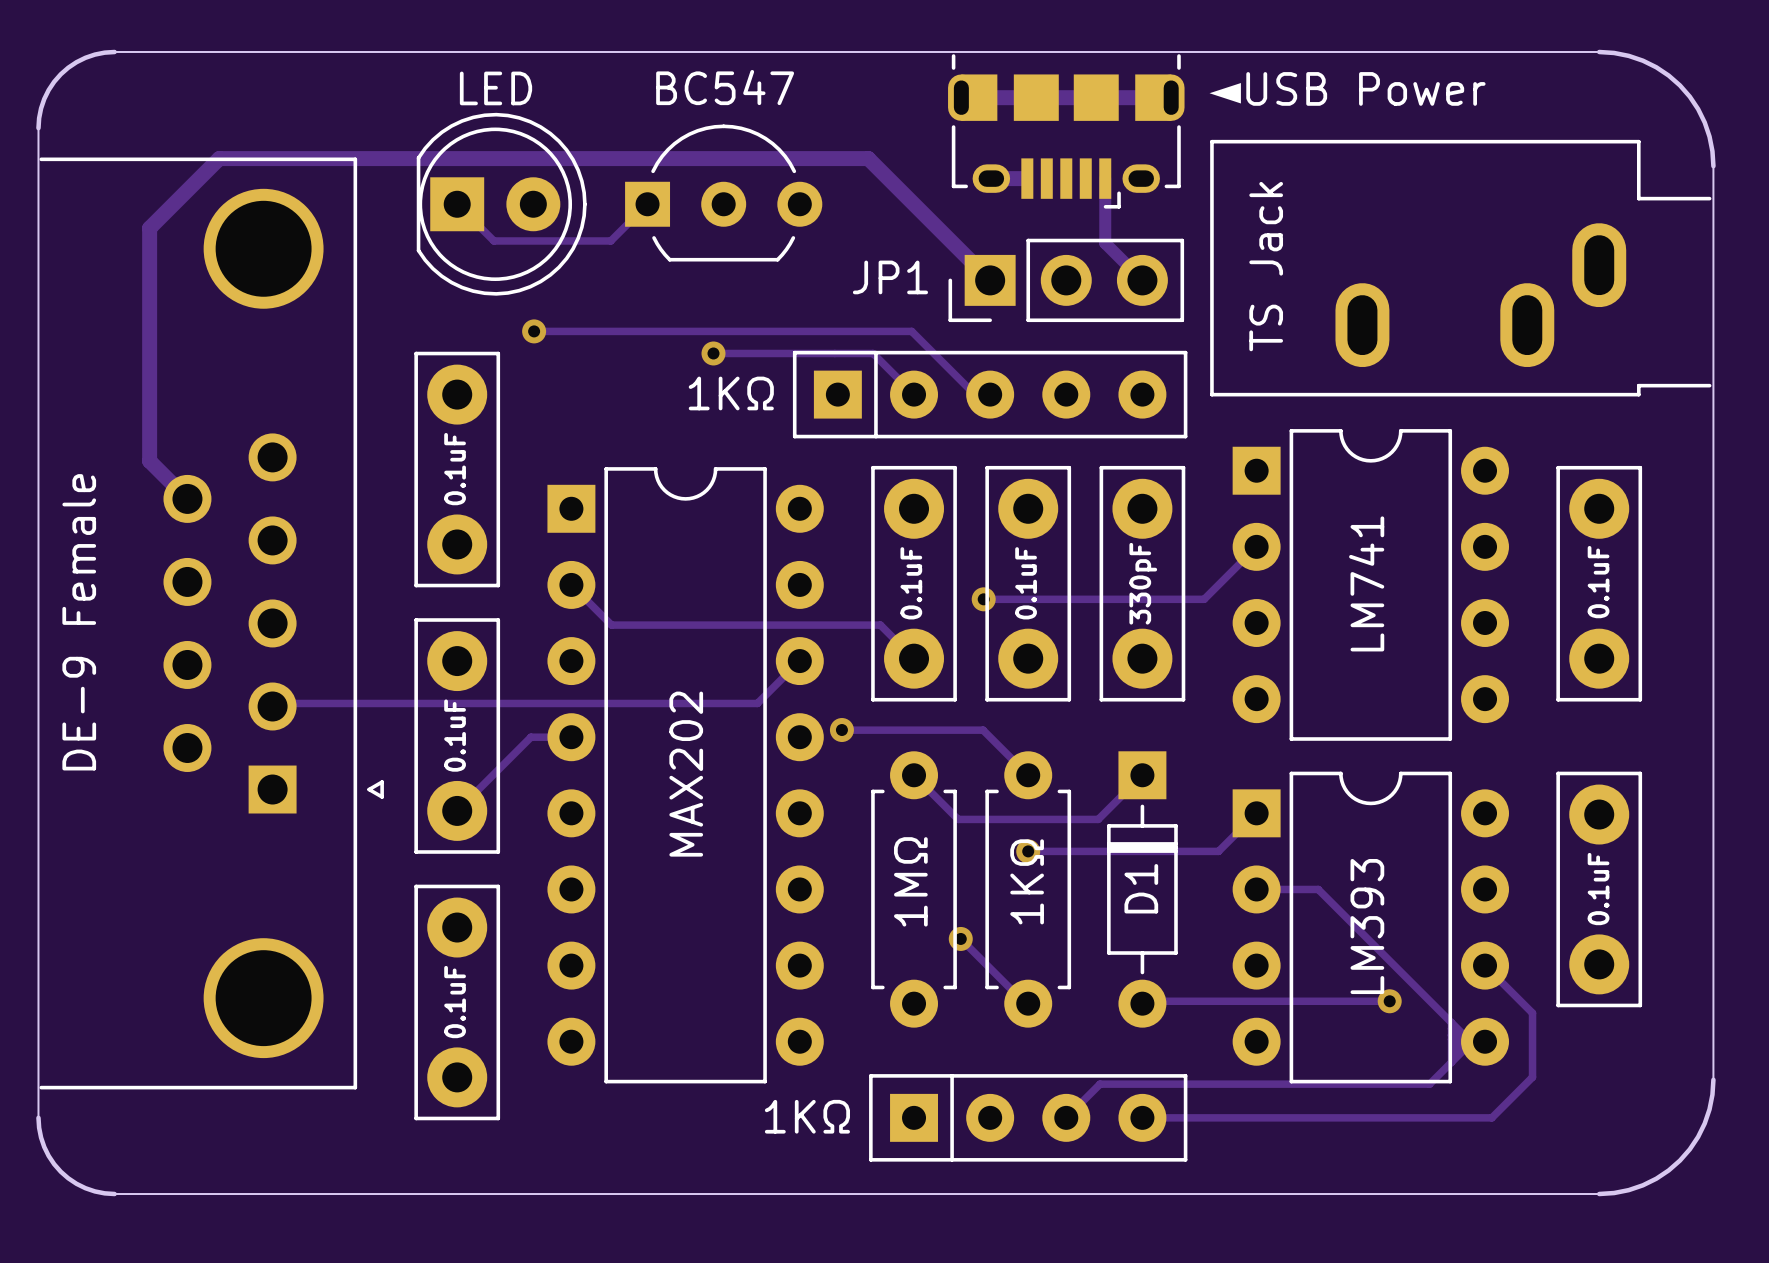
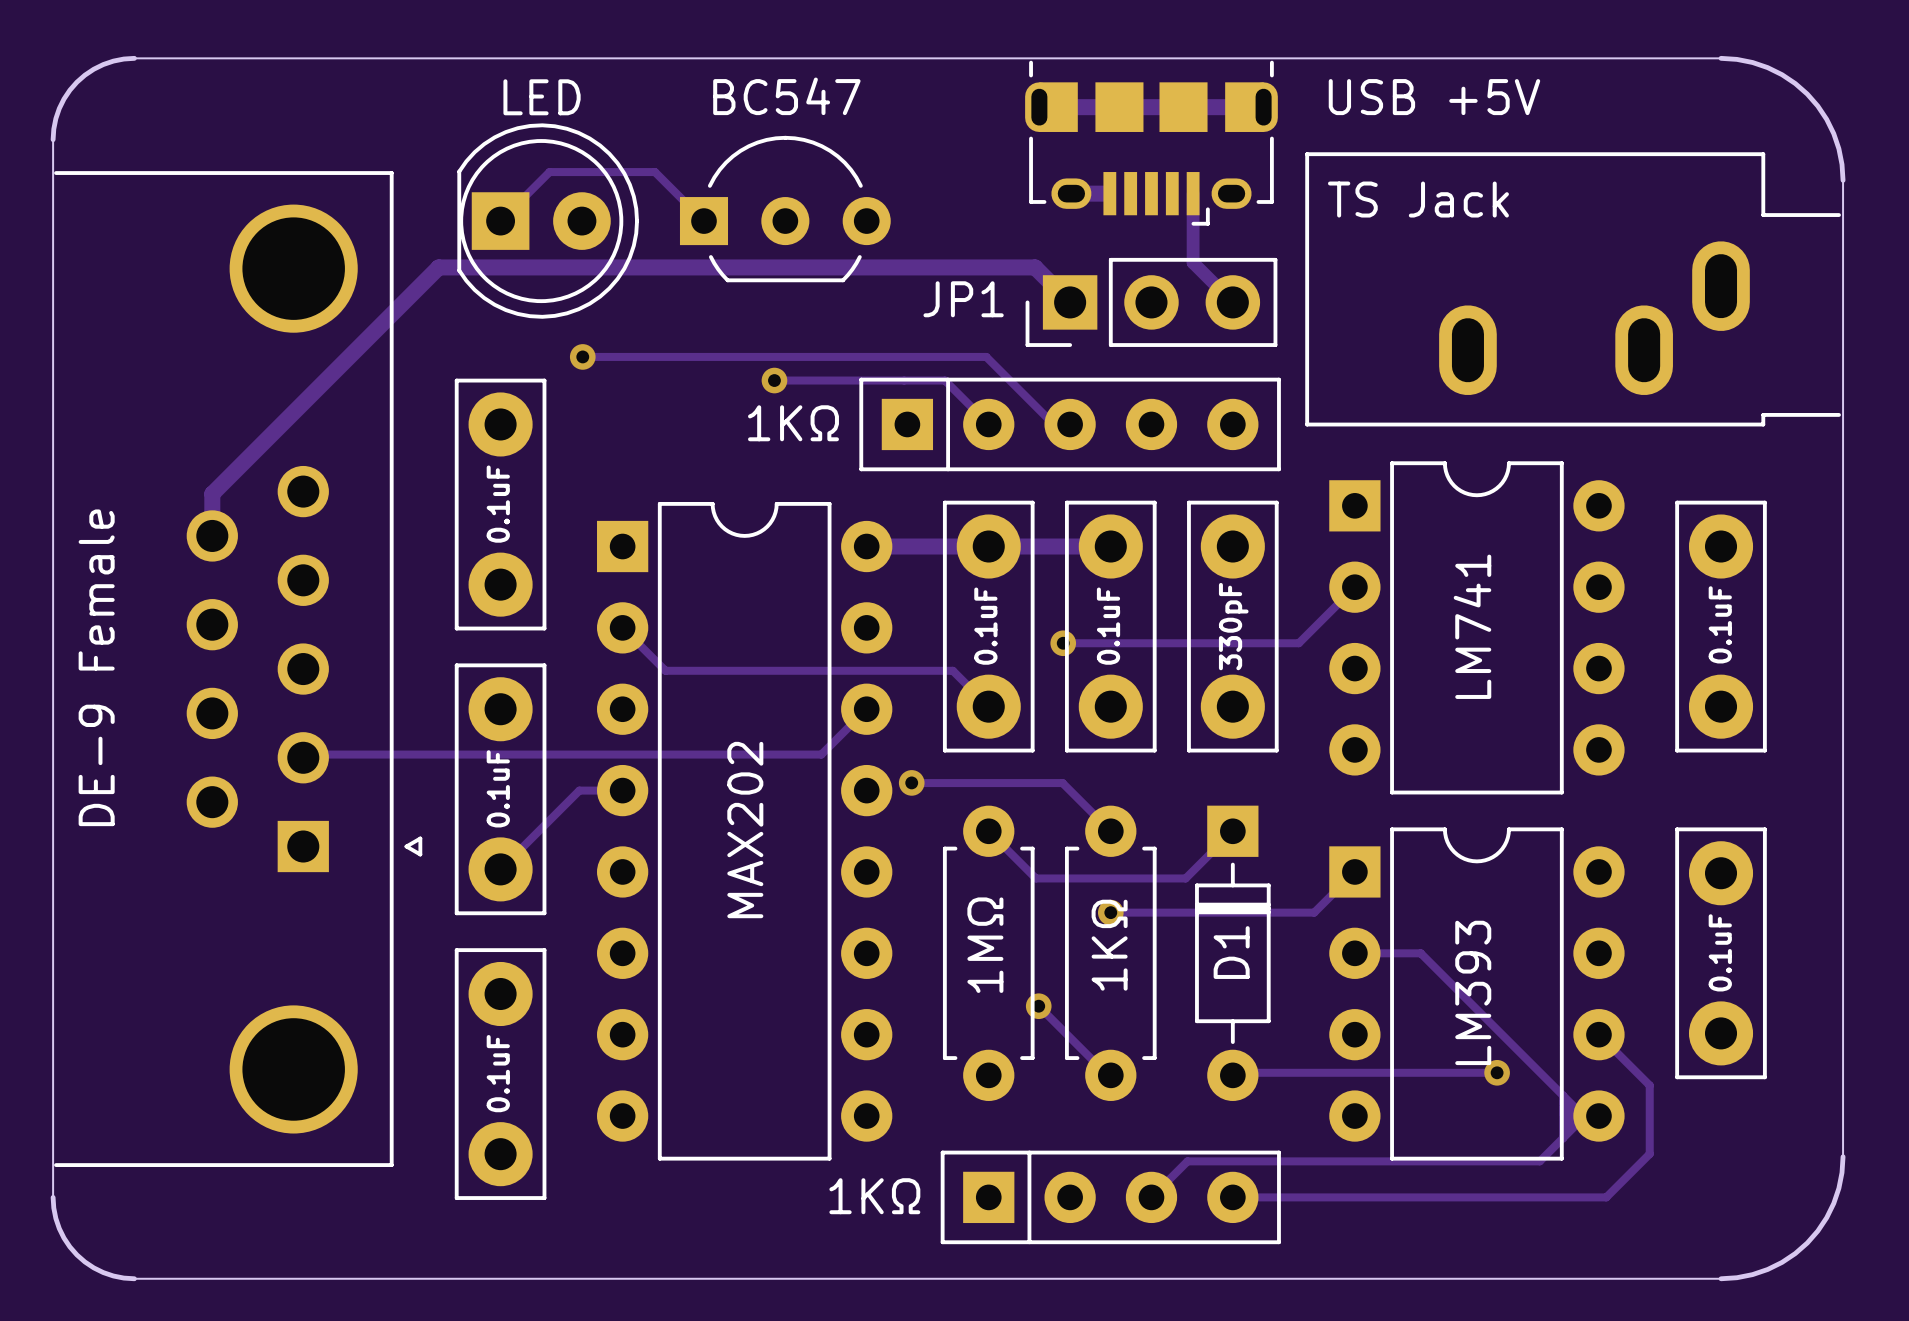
part value: ◄USB Power (1346, 88) -> USB +5V (1434, 97)
track: (457, 204) (493, 240) (610, 240) (647, 204) -> (500, 221) (549, 172) (654, 172) (703, 221)
track: (957, 247) (868, 158) (219, 158) (149, 228) (149, 461) (187, 498) -> (1035, 267) (438, 267) (212, 493) (212, 529)
part value rotation: 0° (1266, 266) -> 90° clockwise (1418, 199)
track: none -> (866, 546) (1110, 546)

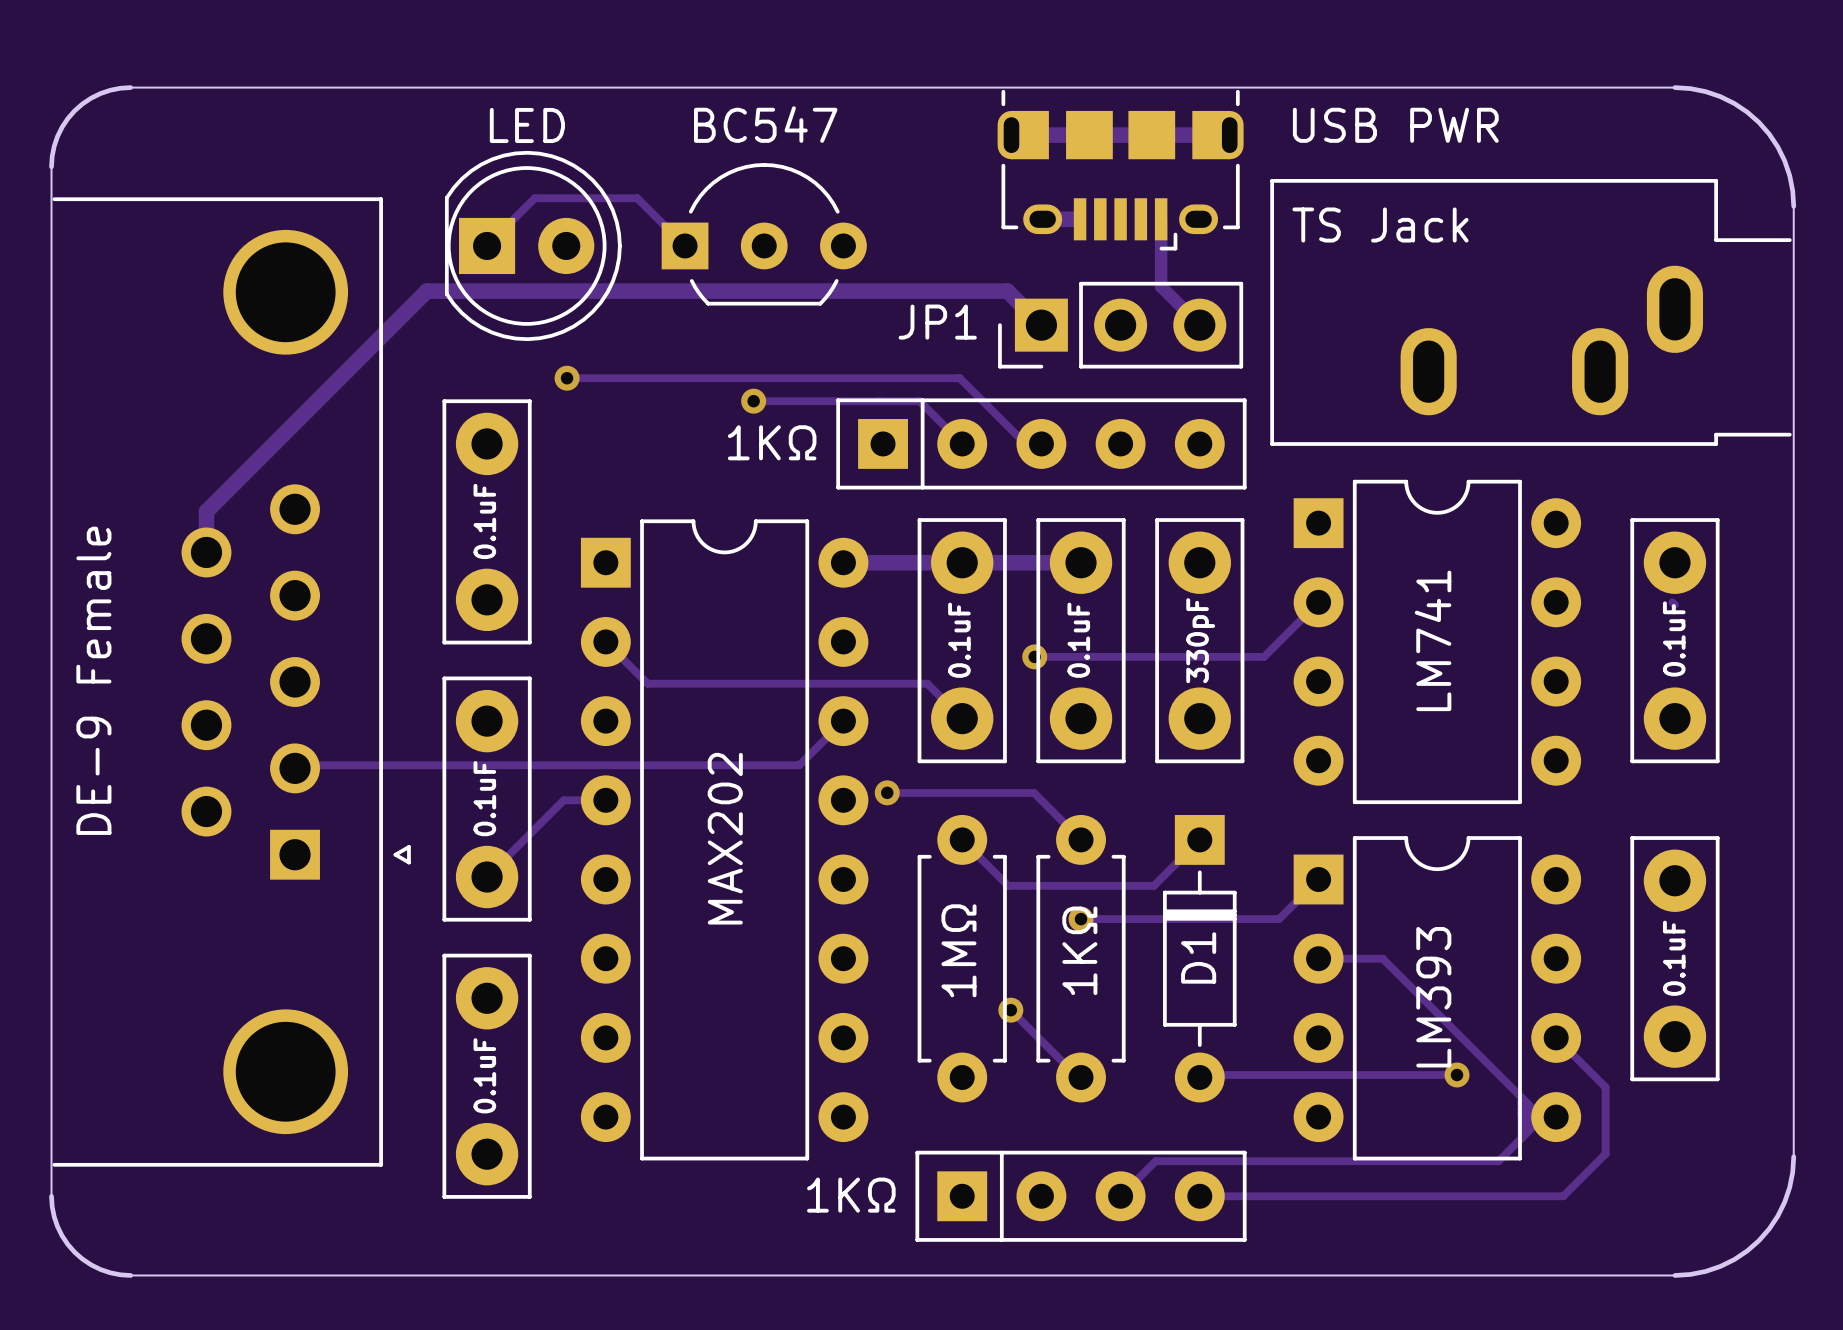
part value: USB +5V (1434, 97) -> USB PWR (1395, 125)
track: none -> (1672, 602) (1674, 604)

